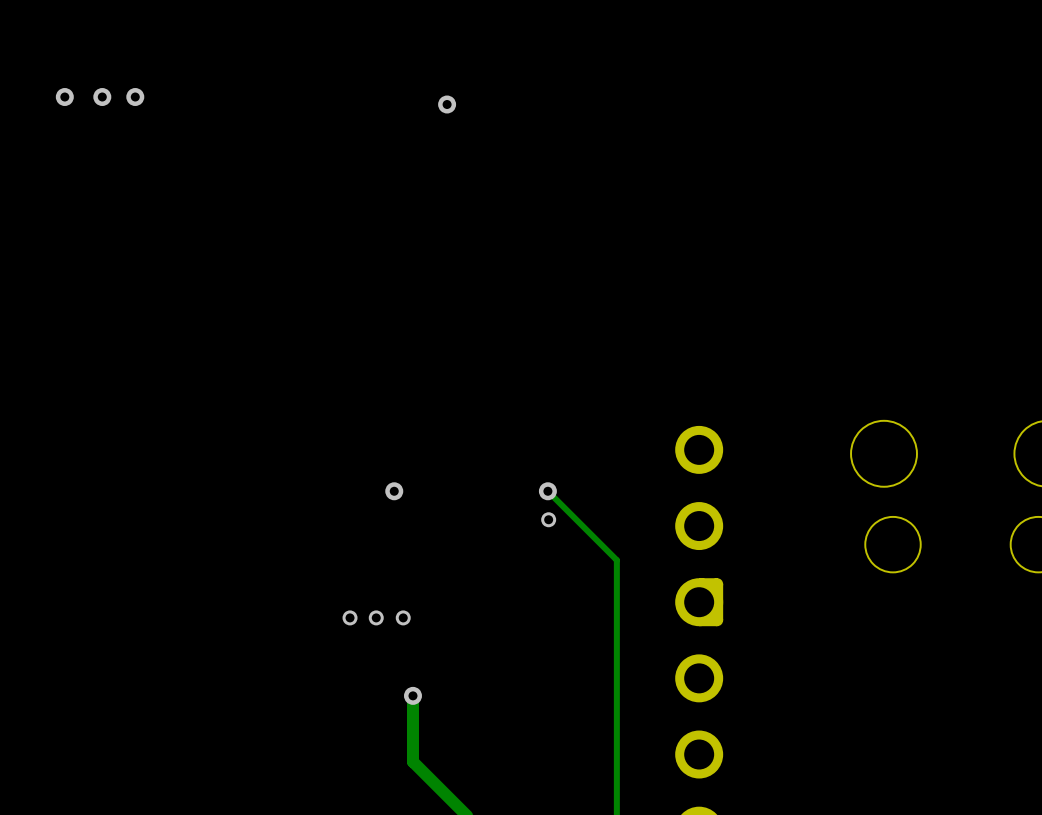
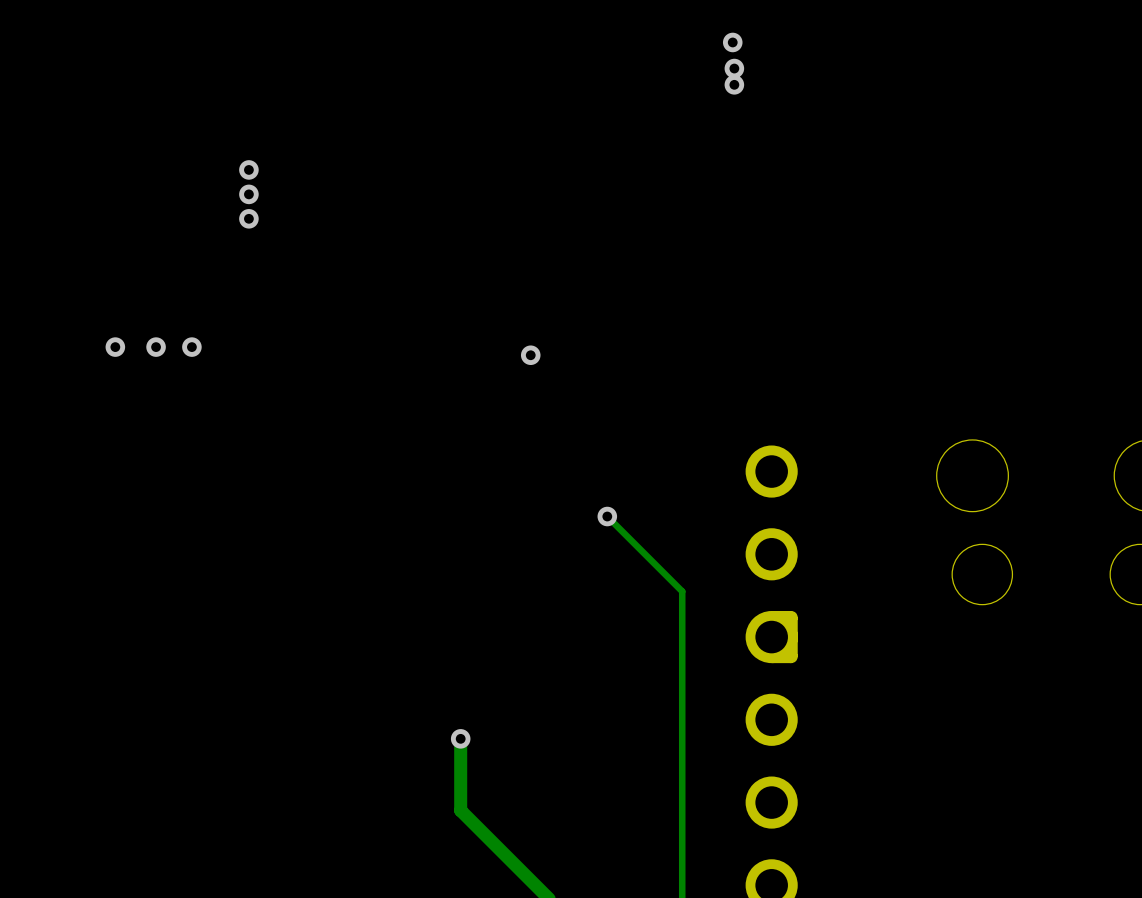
via: none -> (732, 42)
via: none -> (734, 68)
via: none -> (734, 84)
via: (64, 97) -> none
via: (102, 97) -> none
via: (135, 97) -> none
via: (447, 104) -> none
via: none -> (248, 169)
via: none -> (248, 194)
via: none -> (248, 218)
via: none -> (115, 347)
via: none -> (156, 347)
via: none -> (191, 347)
via: none -> (530, 355)
via: (394, 491) -> none
via: (548, 519) -> none
via: (350, 617) -> none
via: (376, 617) -> none
via: (403, 617) -> none

